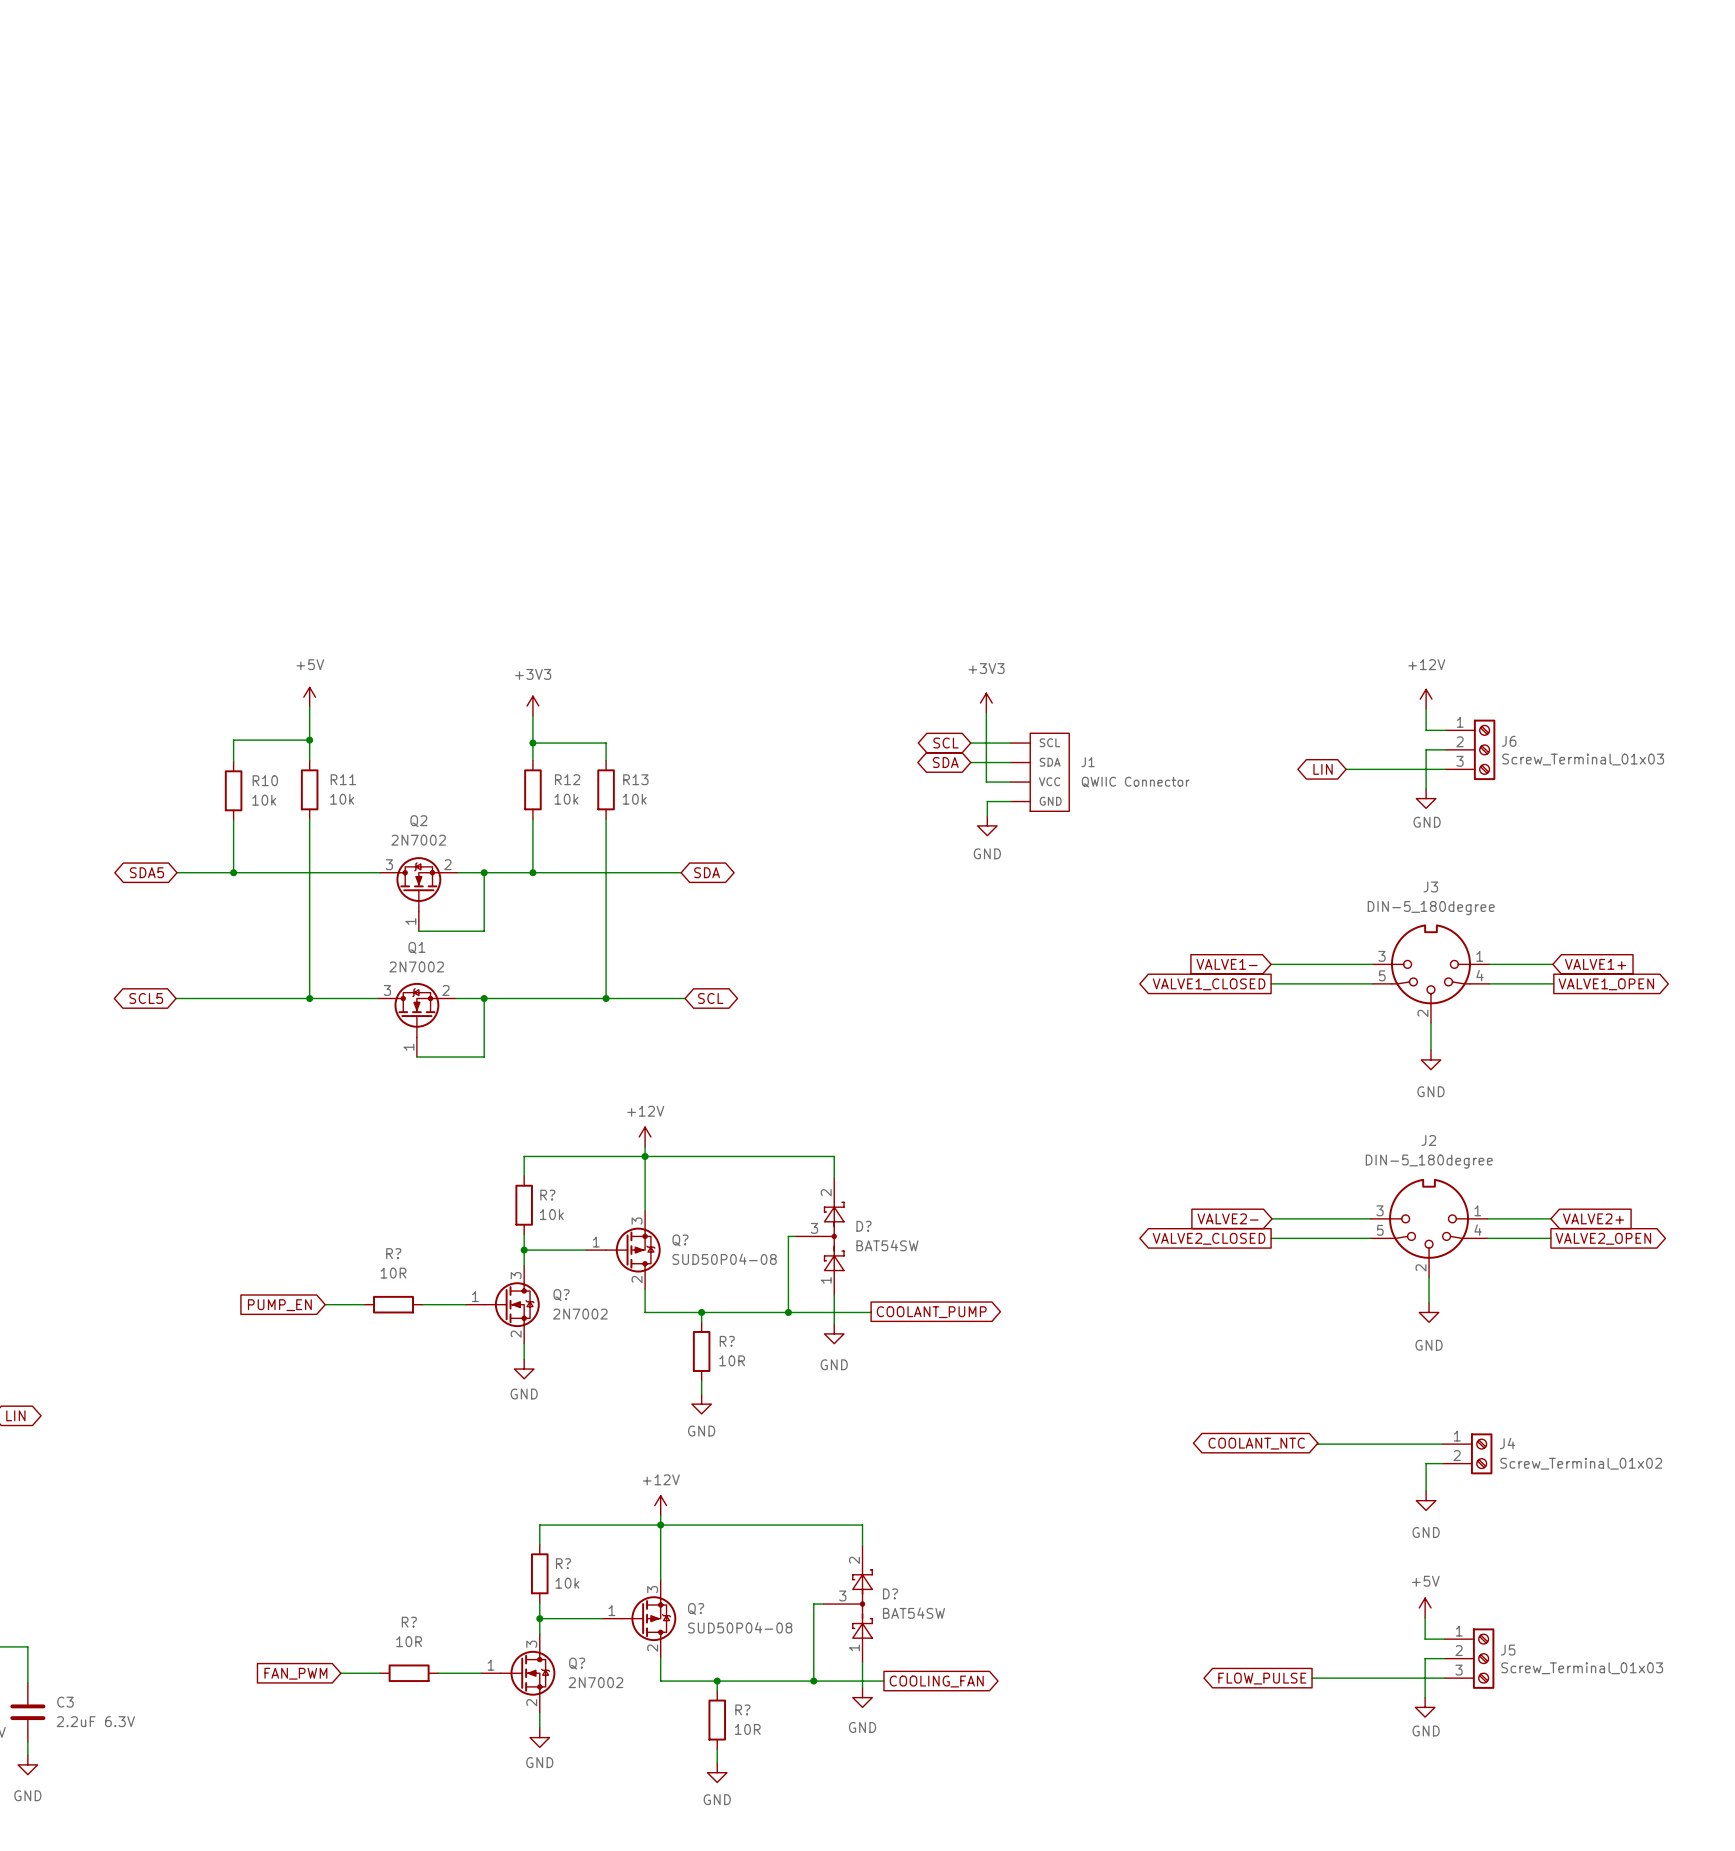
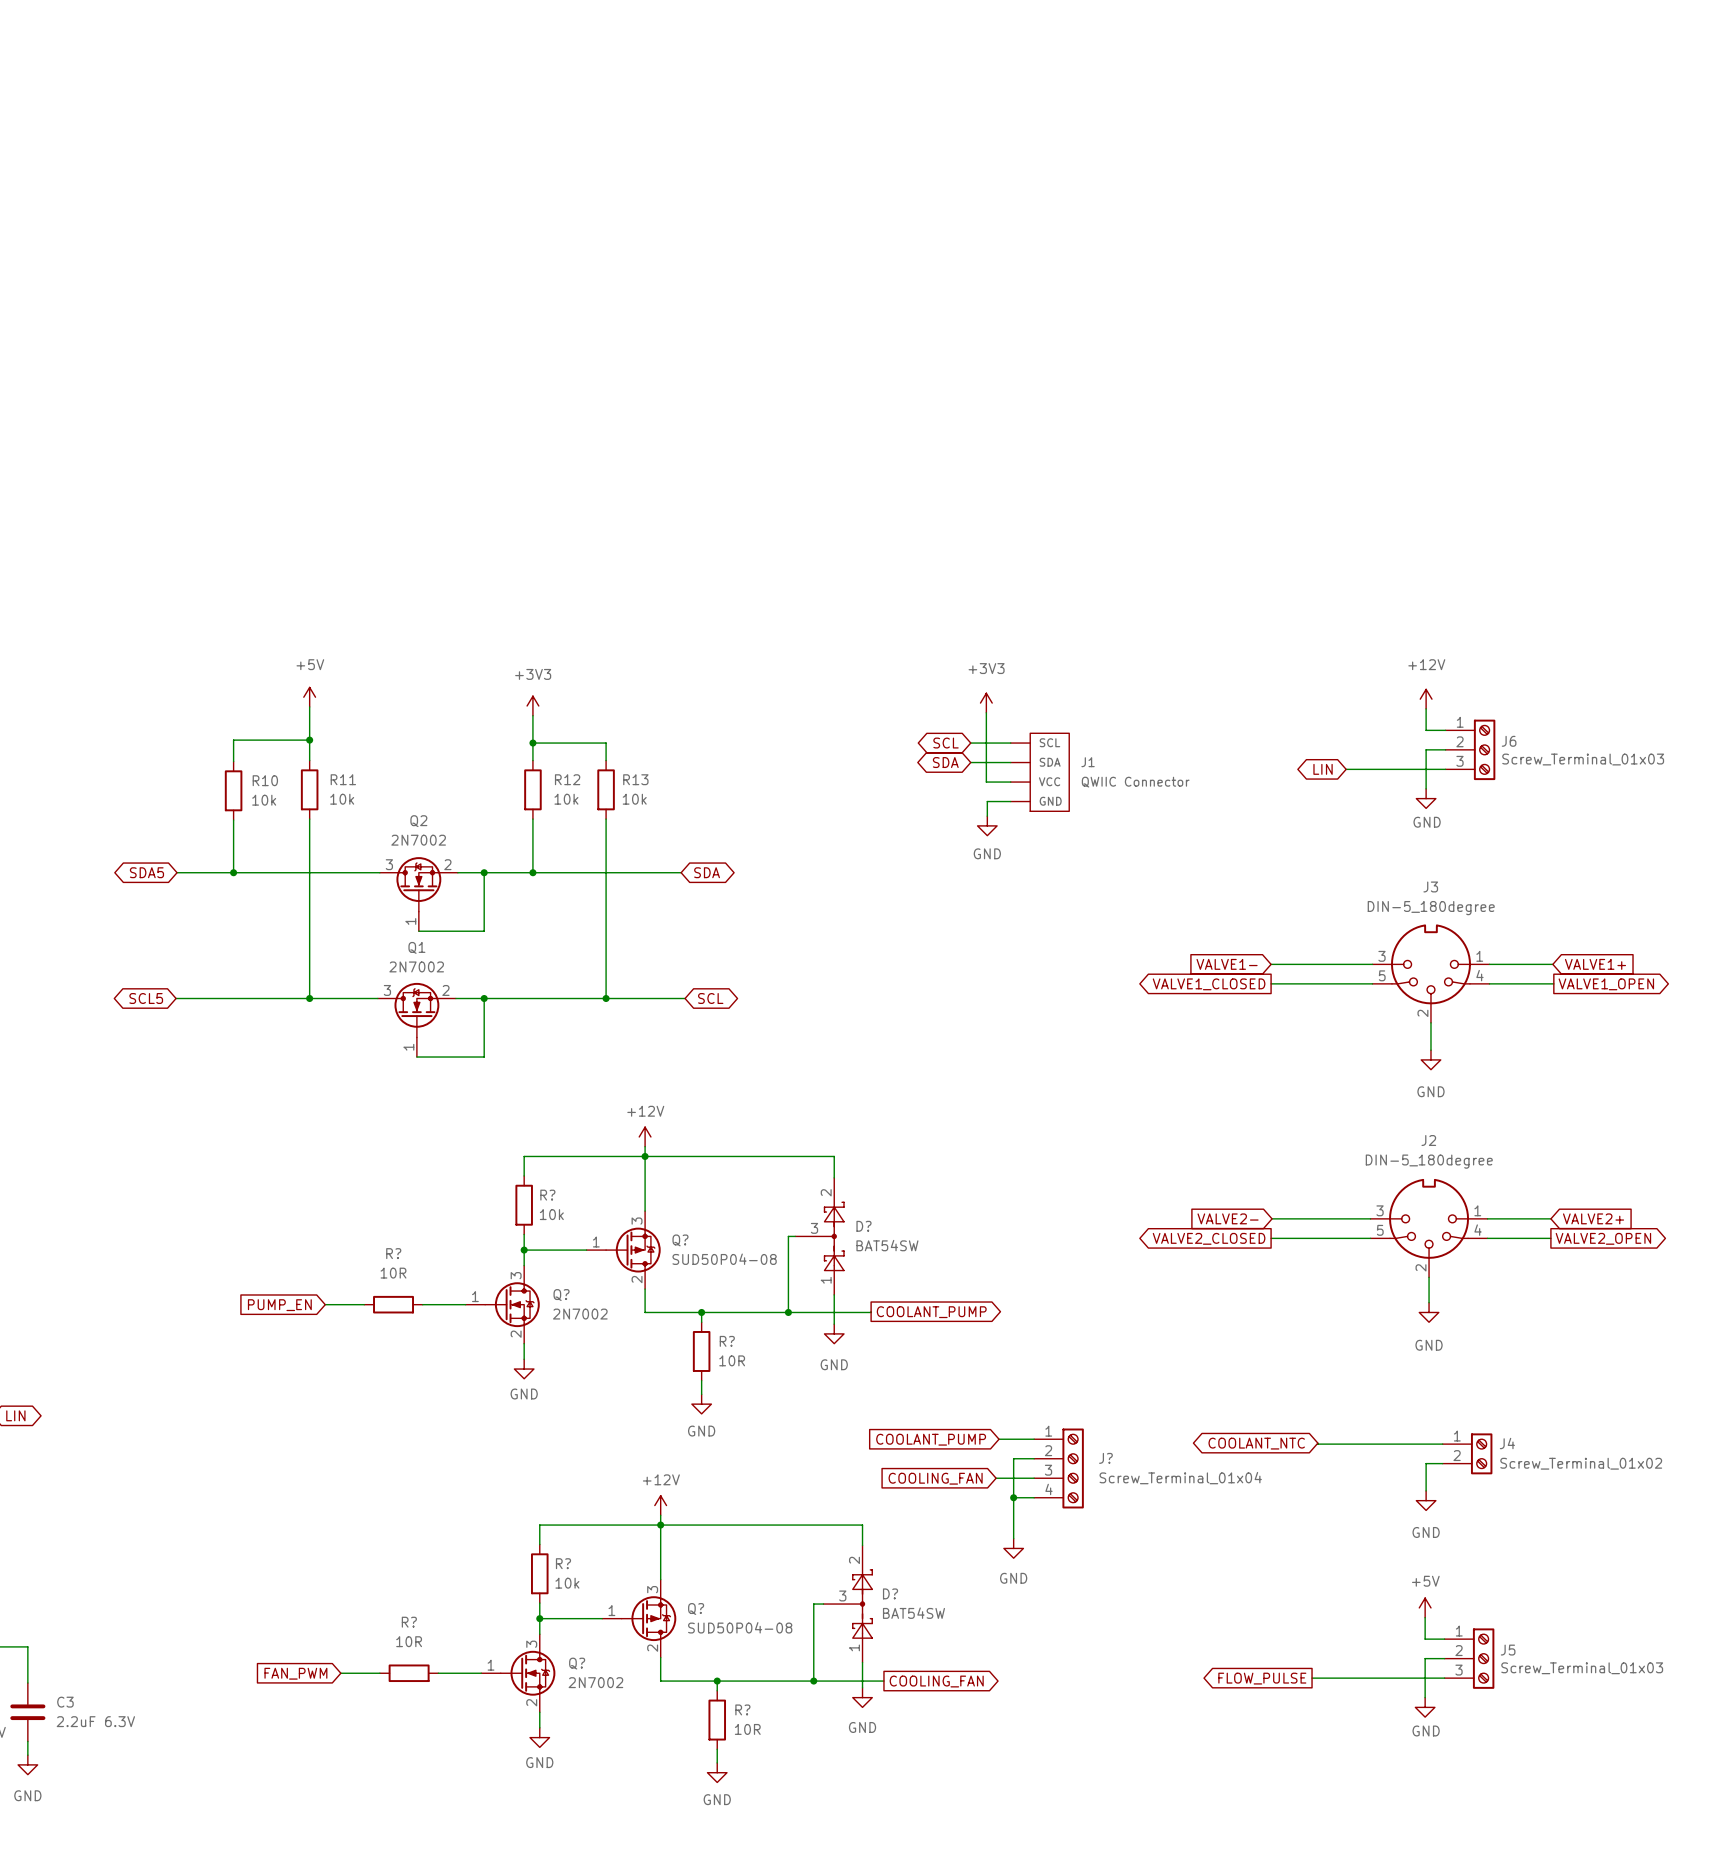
global label: none -> COOLANT_PUMP (931, 1439)
wire: none -> (999, 1439) (1034, 1439)
wire: none -> (1034, 1458) (1013, 1458) (1013, 1538)
J?: none -> Screw_Terminal_01x04 (1058, 1468)
global label: none -> COOLING_FAN (935, 1478)
wire: none -> (996, 1478) (1034, 1478)
wire: none -> (1013, 1497) (1034, 1497)
junction: none -> (1013, 1497)
power symbol: none -> GND (1013, 1548)

